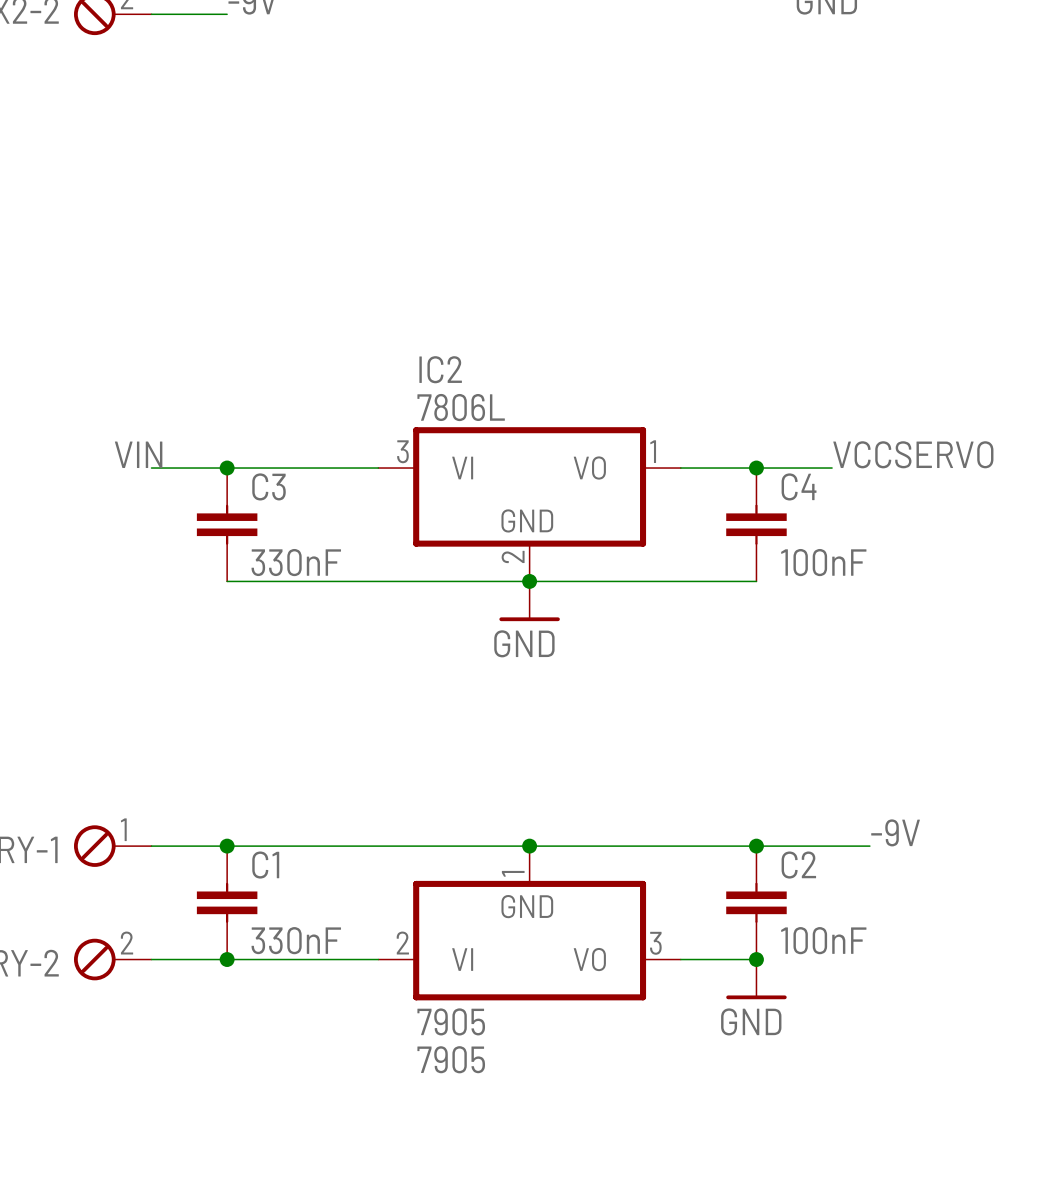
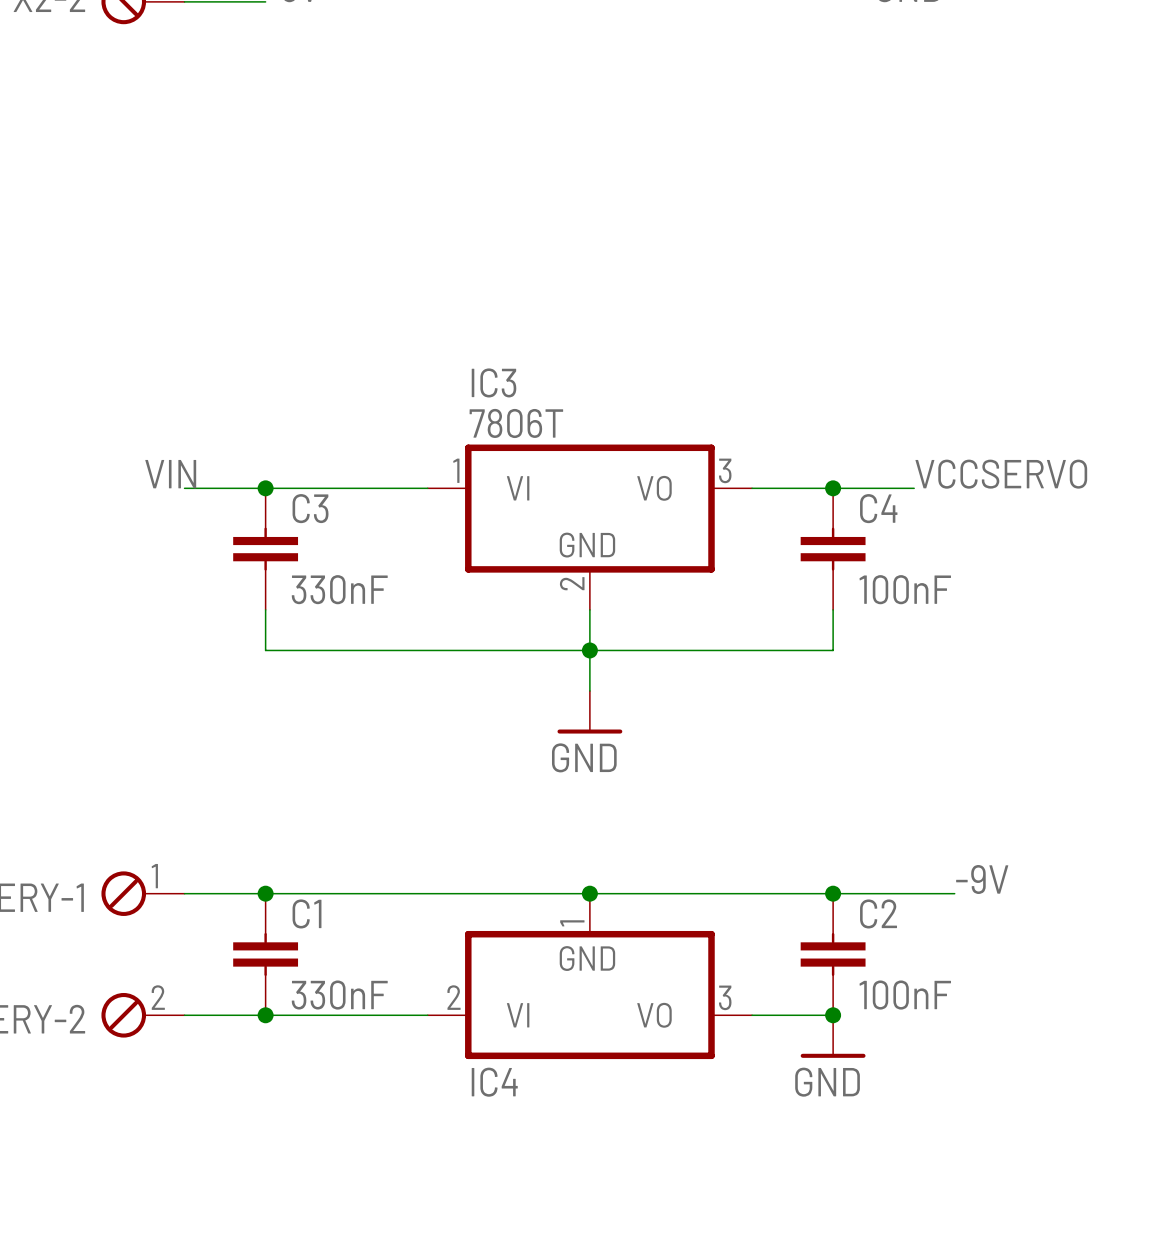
IC2 name: IC2 (440, 369) -> IC3 (494, 382)
IC2 value: 7806L (461, 407) -> 7806T (516, 423)
IC2 pin number: 3 (402, 451) -> 1 (456, 470)
IC2 pin number: 1 (653, 451) -> 3 (725, 470)
wire: (227, 581) (756, 581) -> (265, 609) (265, 650) (833, 650) (833, 609)
junction position: (529, 581) -> (589, 650)
power symbol position: GND (529, 601) -> GND (589, 712)
7905 name: 7905 (451, 1021) -> IC4 (494, 1082)
7905 value: 7905 (451, 1059) -> none

